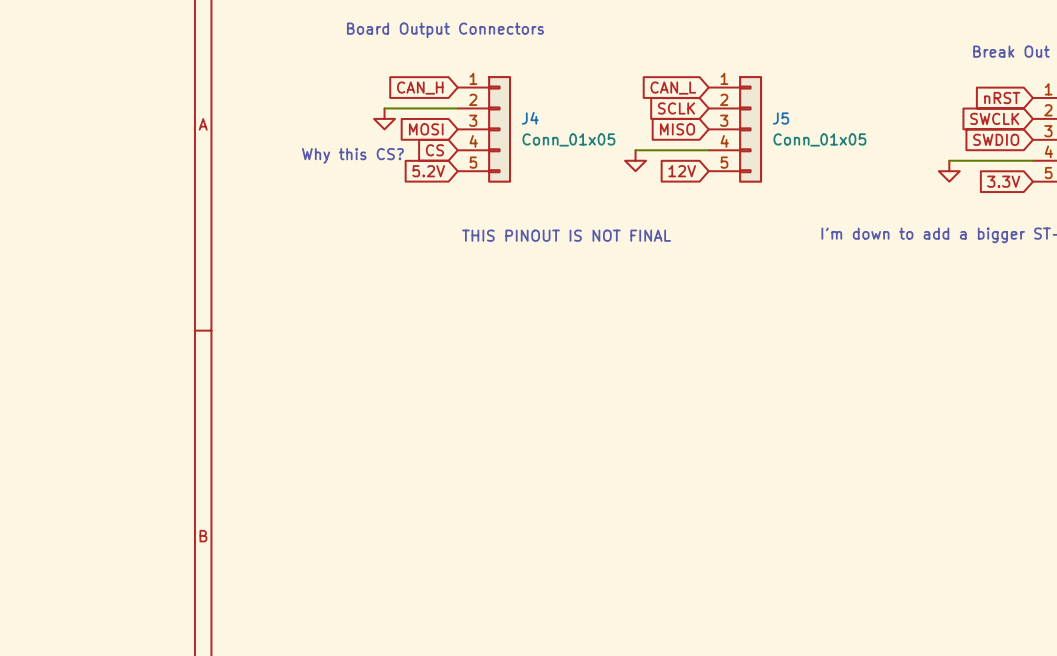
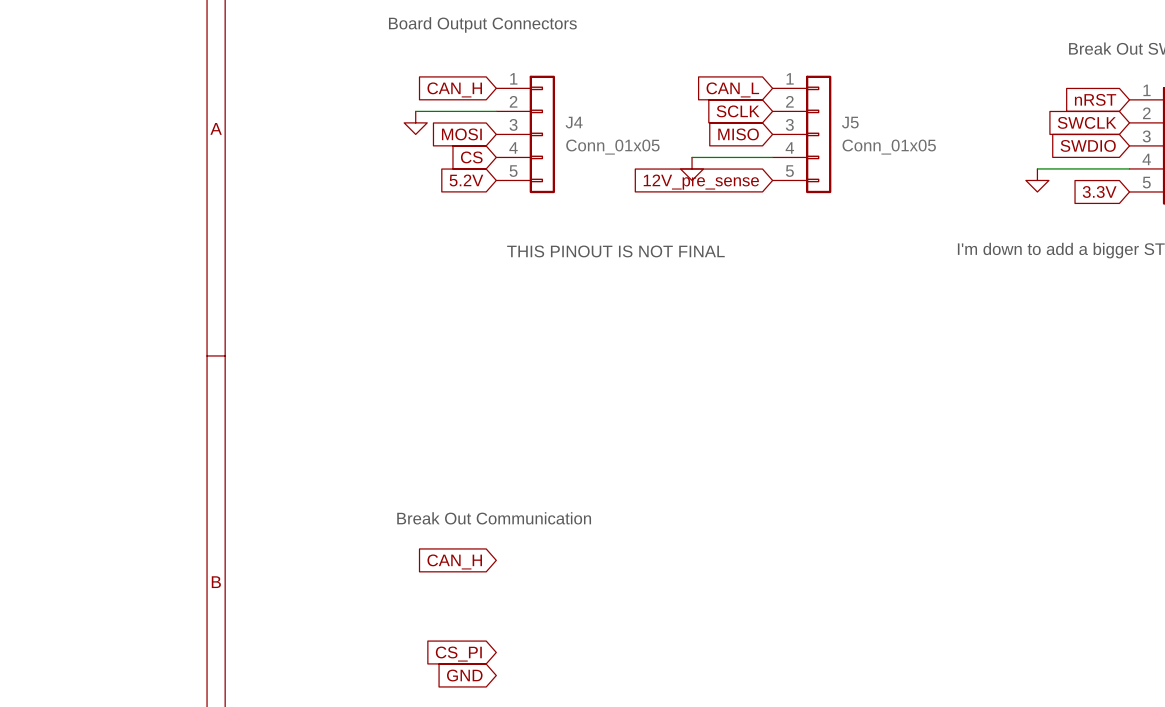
text: Why this CS? (352, 155) -> none
global label: 12V (682, 171) -> 12V_pre_sense (701, 182)
text: none -> Break Out Communication (494, 518)
global label: none -> CAN_H (454, 561)
global label: none -> CS_PI (458, 654)
global label: none -> GND (464, 675)

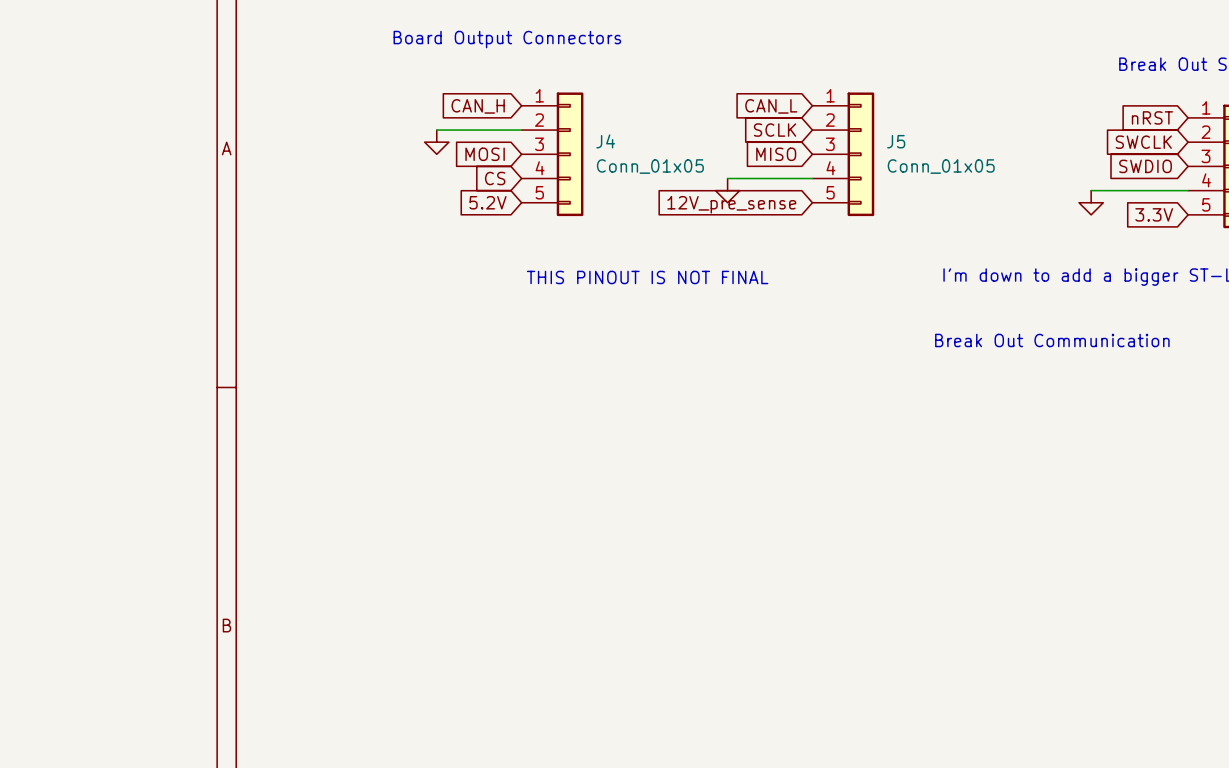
text: none -> Break Out Communication (1052, 340)
text: Break Out Communication (494, 518) -> none
global label: CAN_H (454, 561) -> none
global label: CS_PI (458, 654) -> none
global label: GND (464, 675) -> none

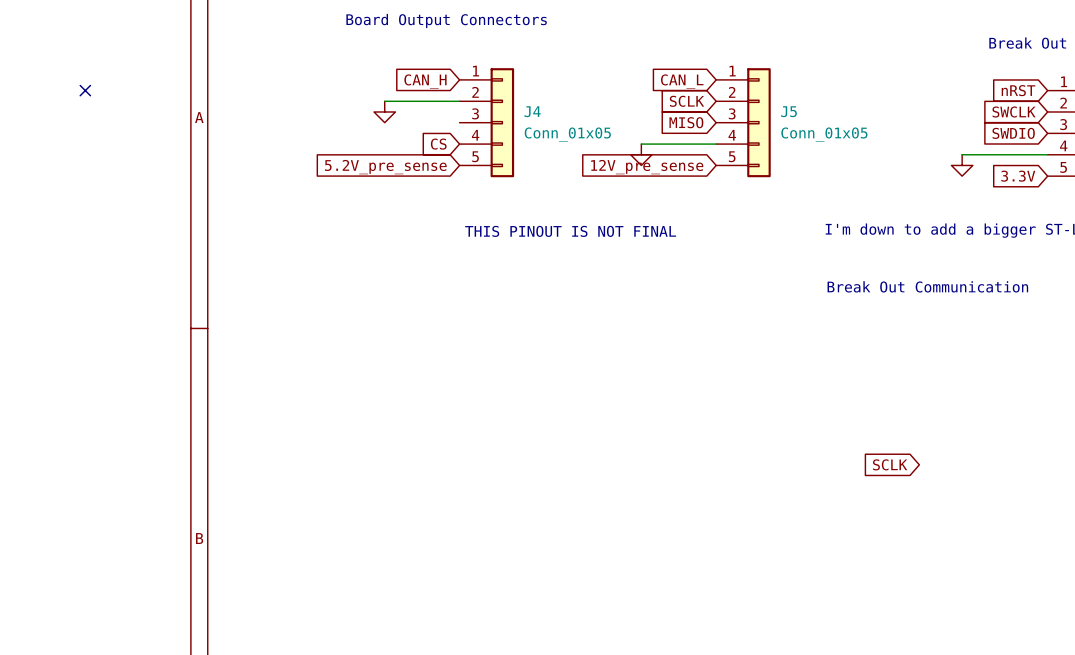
no-connect mark: none -> (85, 90)
global label: MOSI (485, 154) -> none
global label: 5.2V (487, 202) -> 5.2V_pre_sense (385, 167)
global label: none -> SCLK (890, 464)

